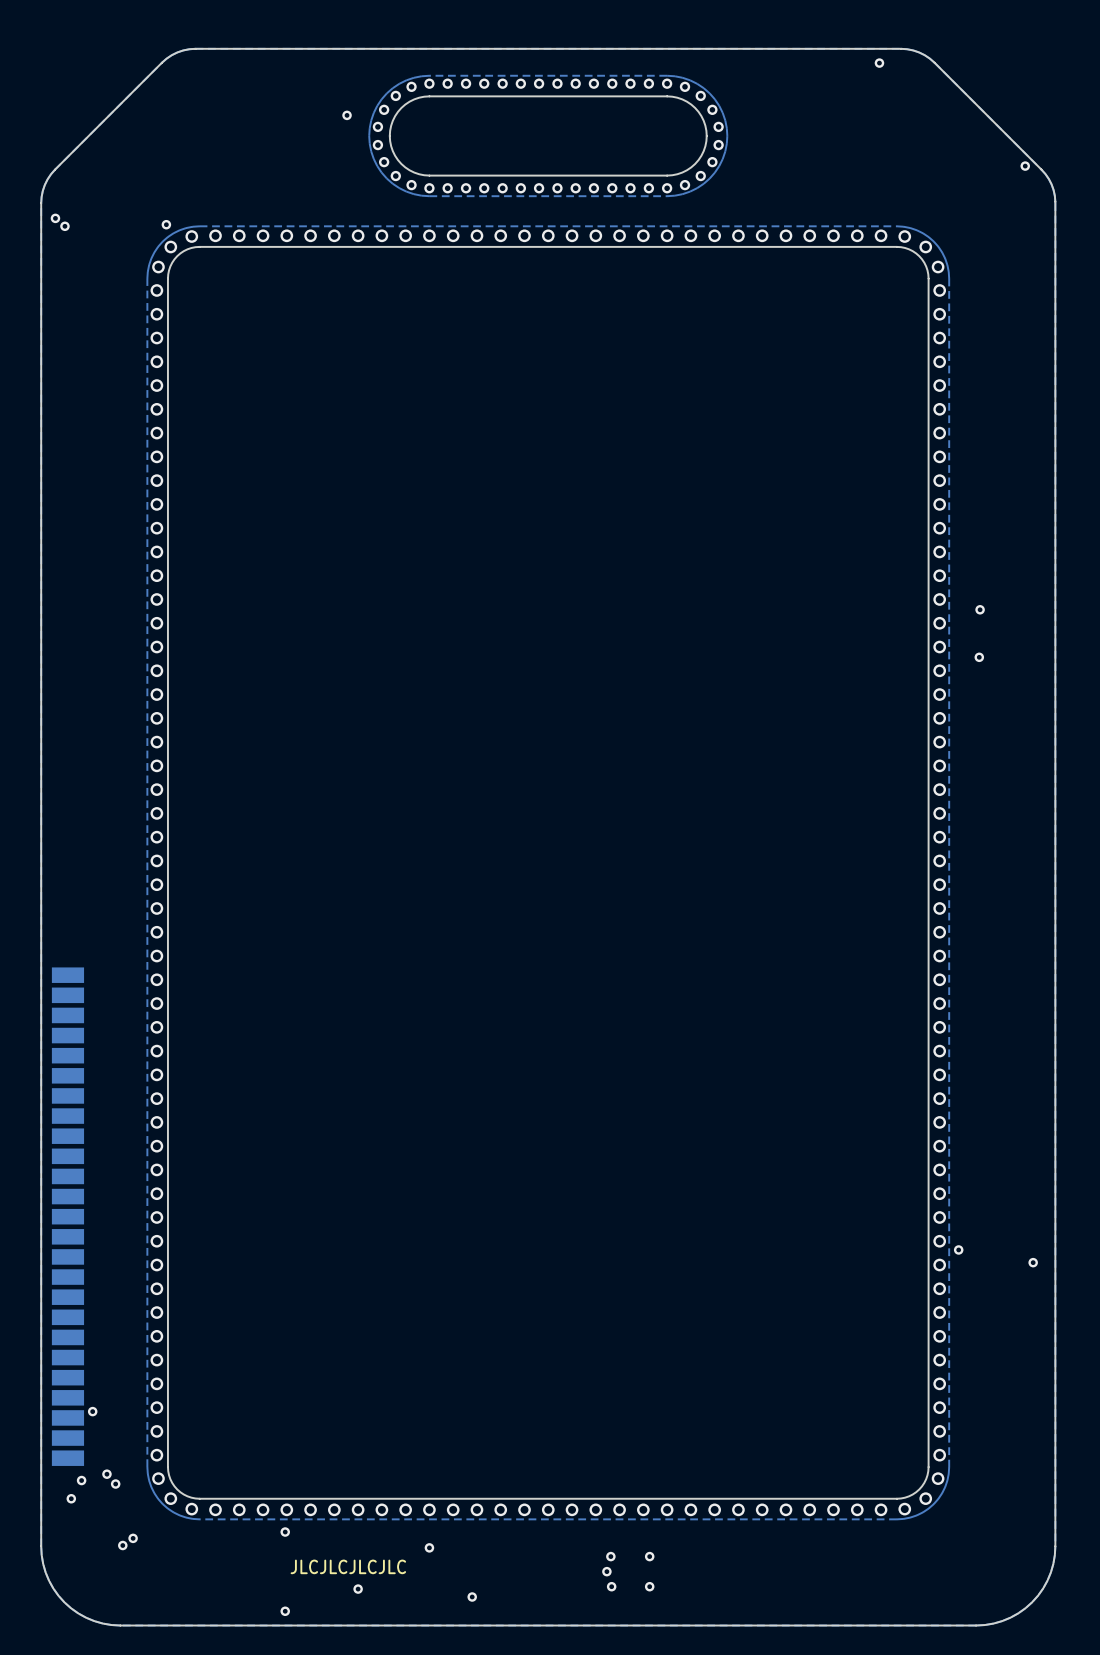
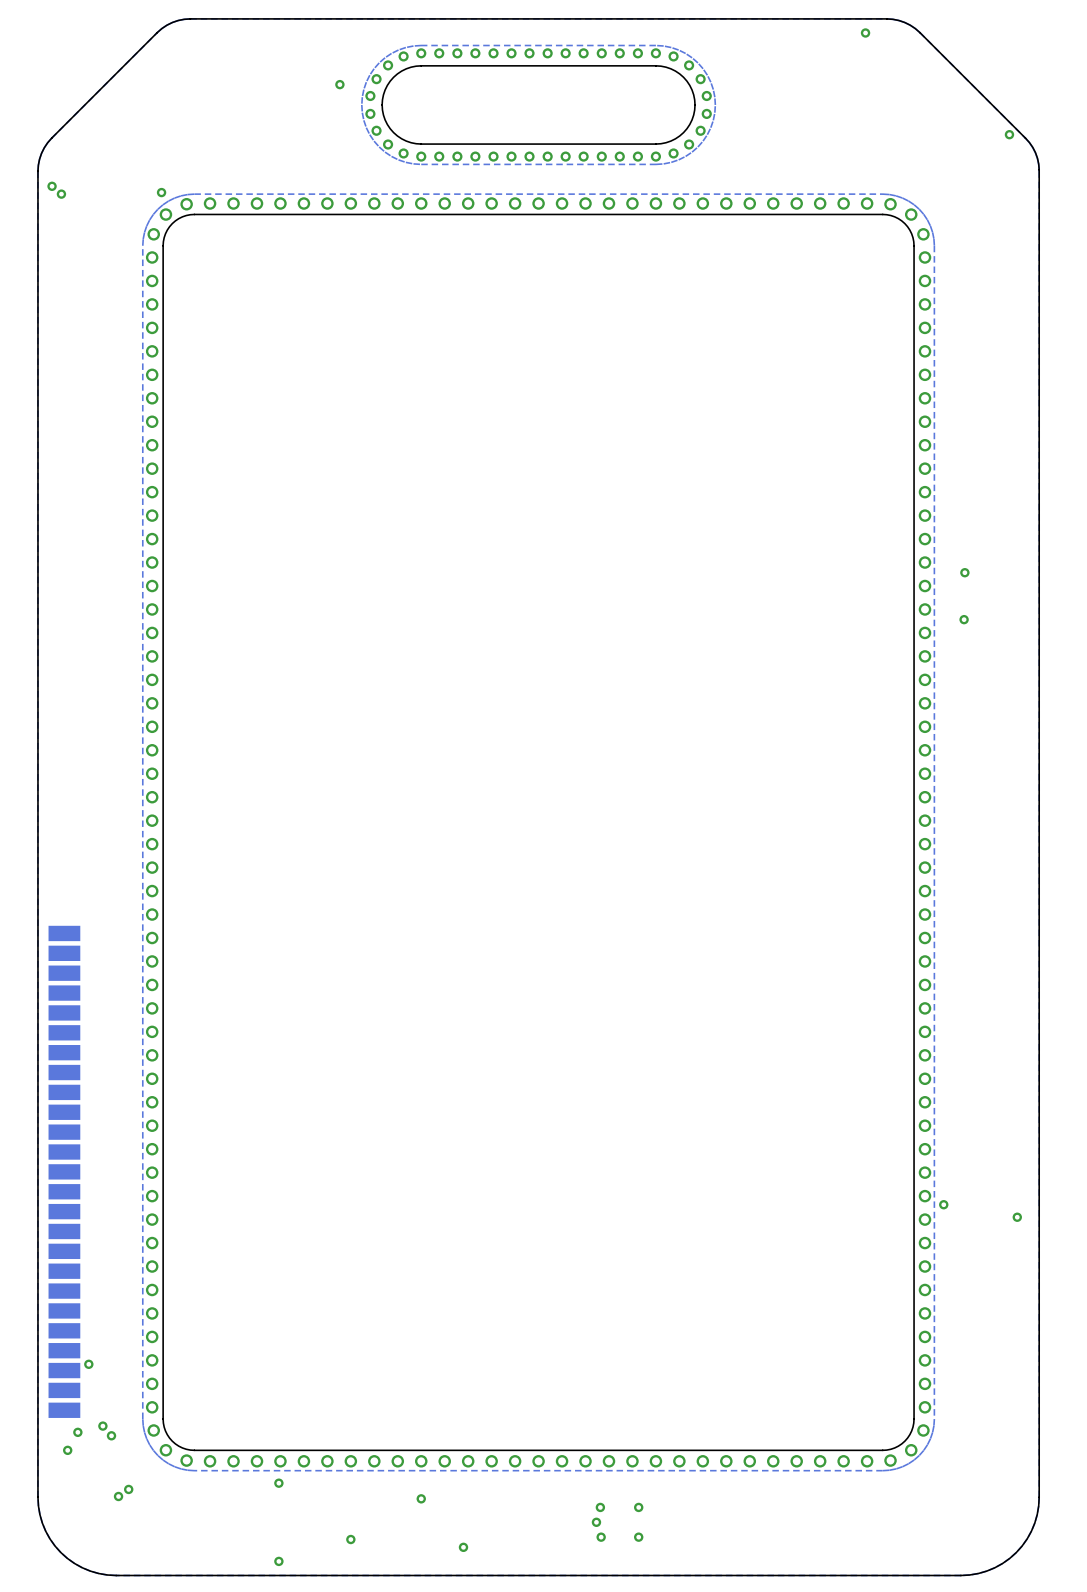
text: JLCJLCJLCJLC (348, 1566) -> none

